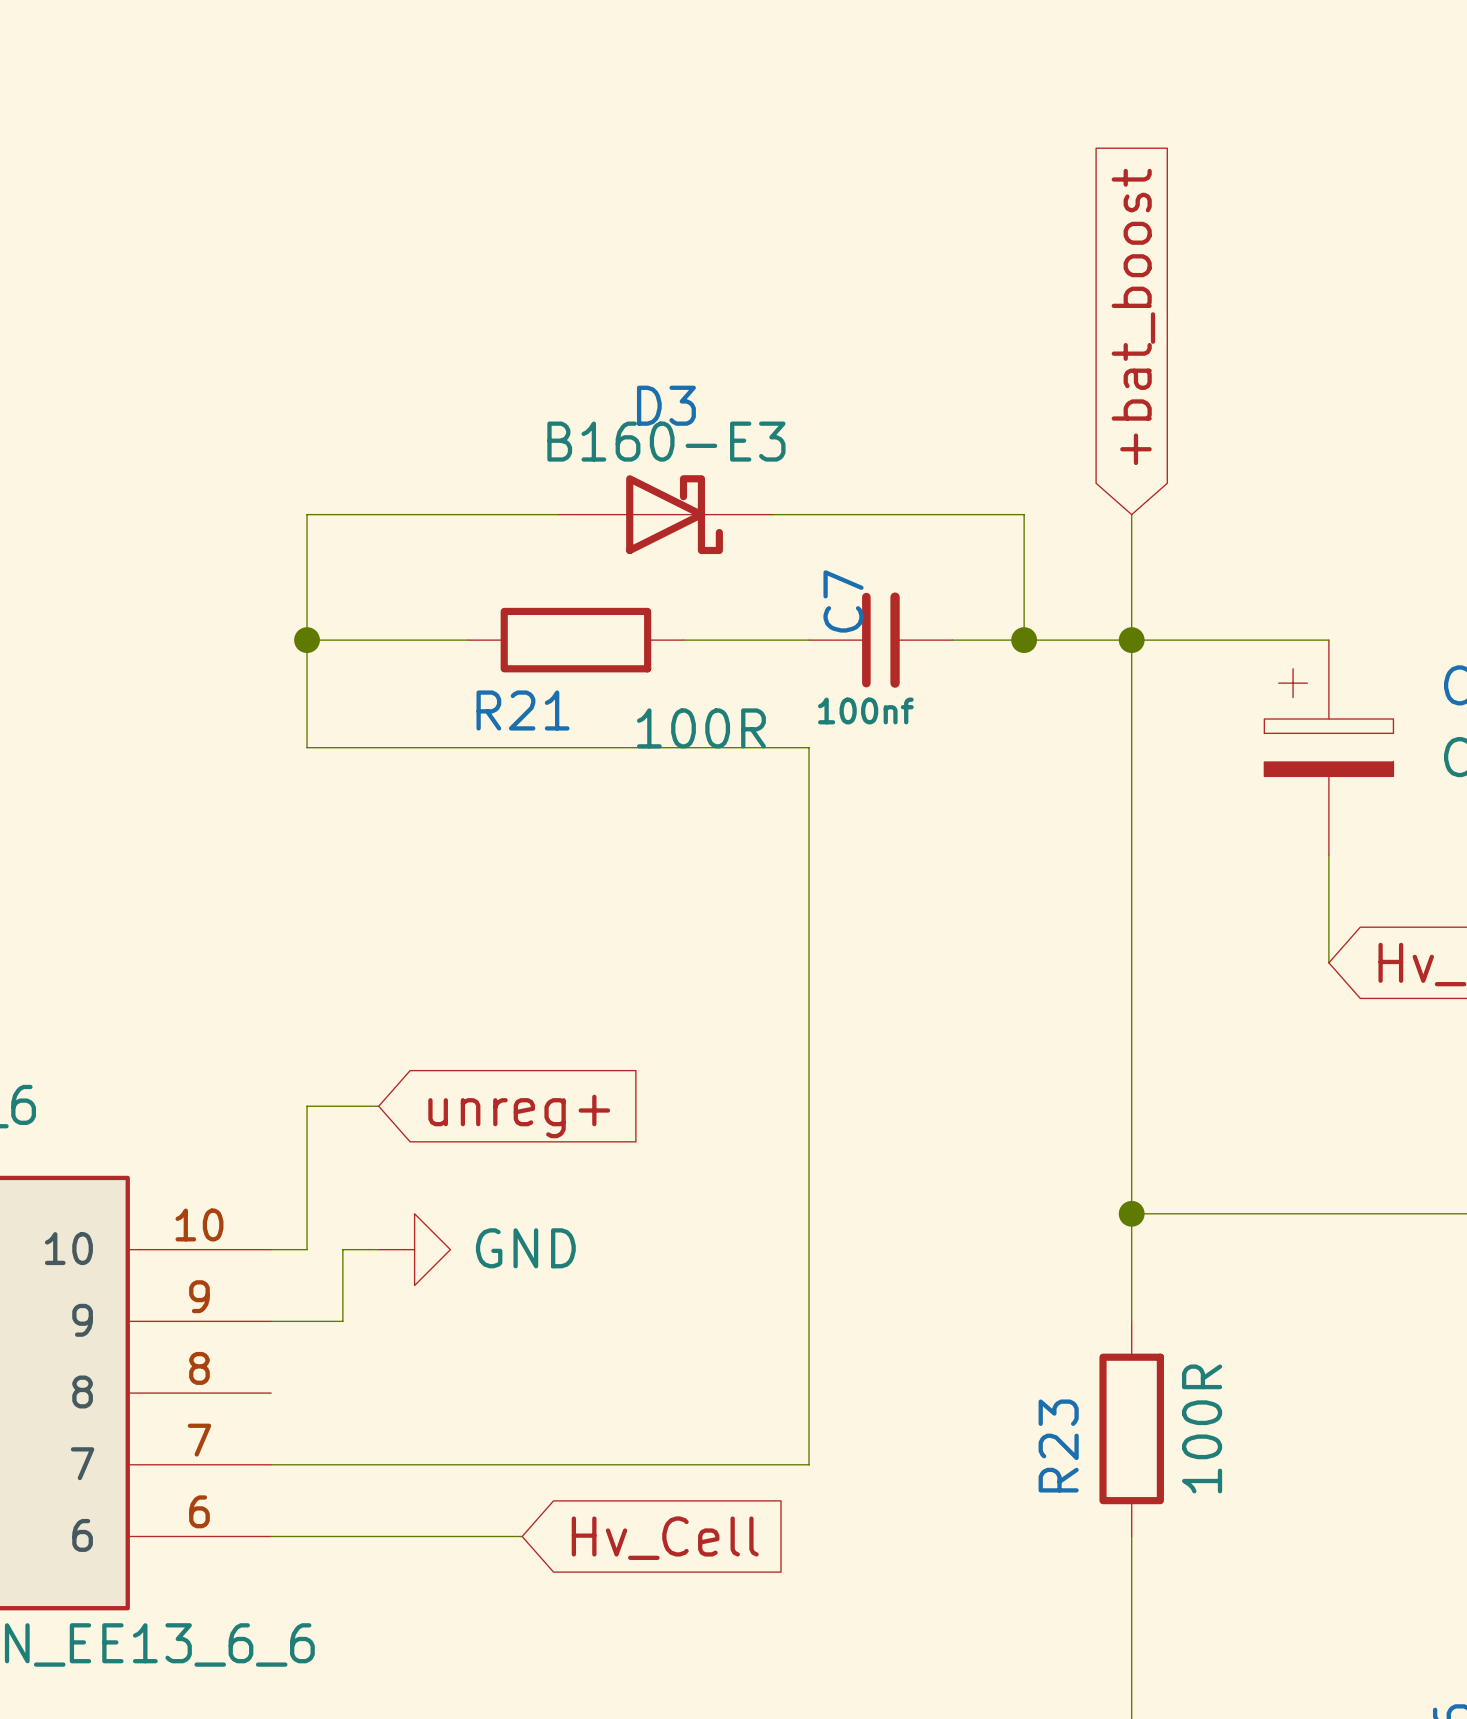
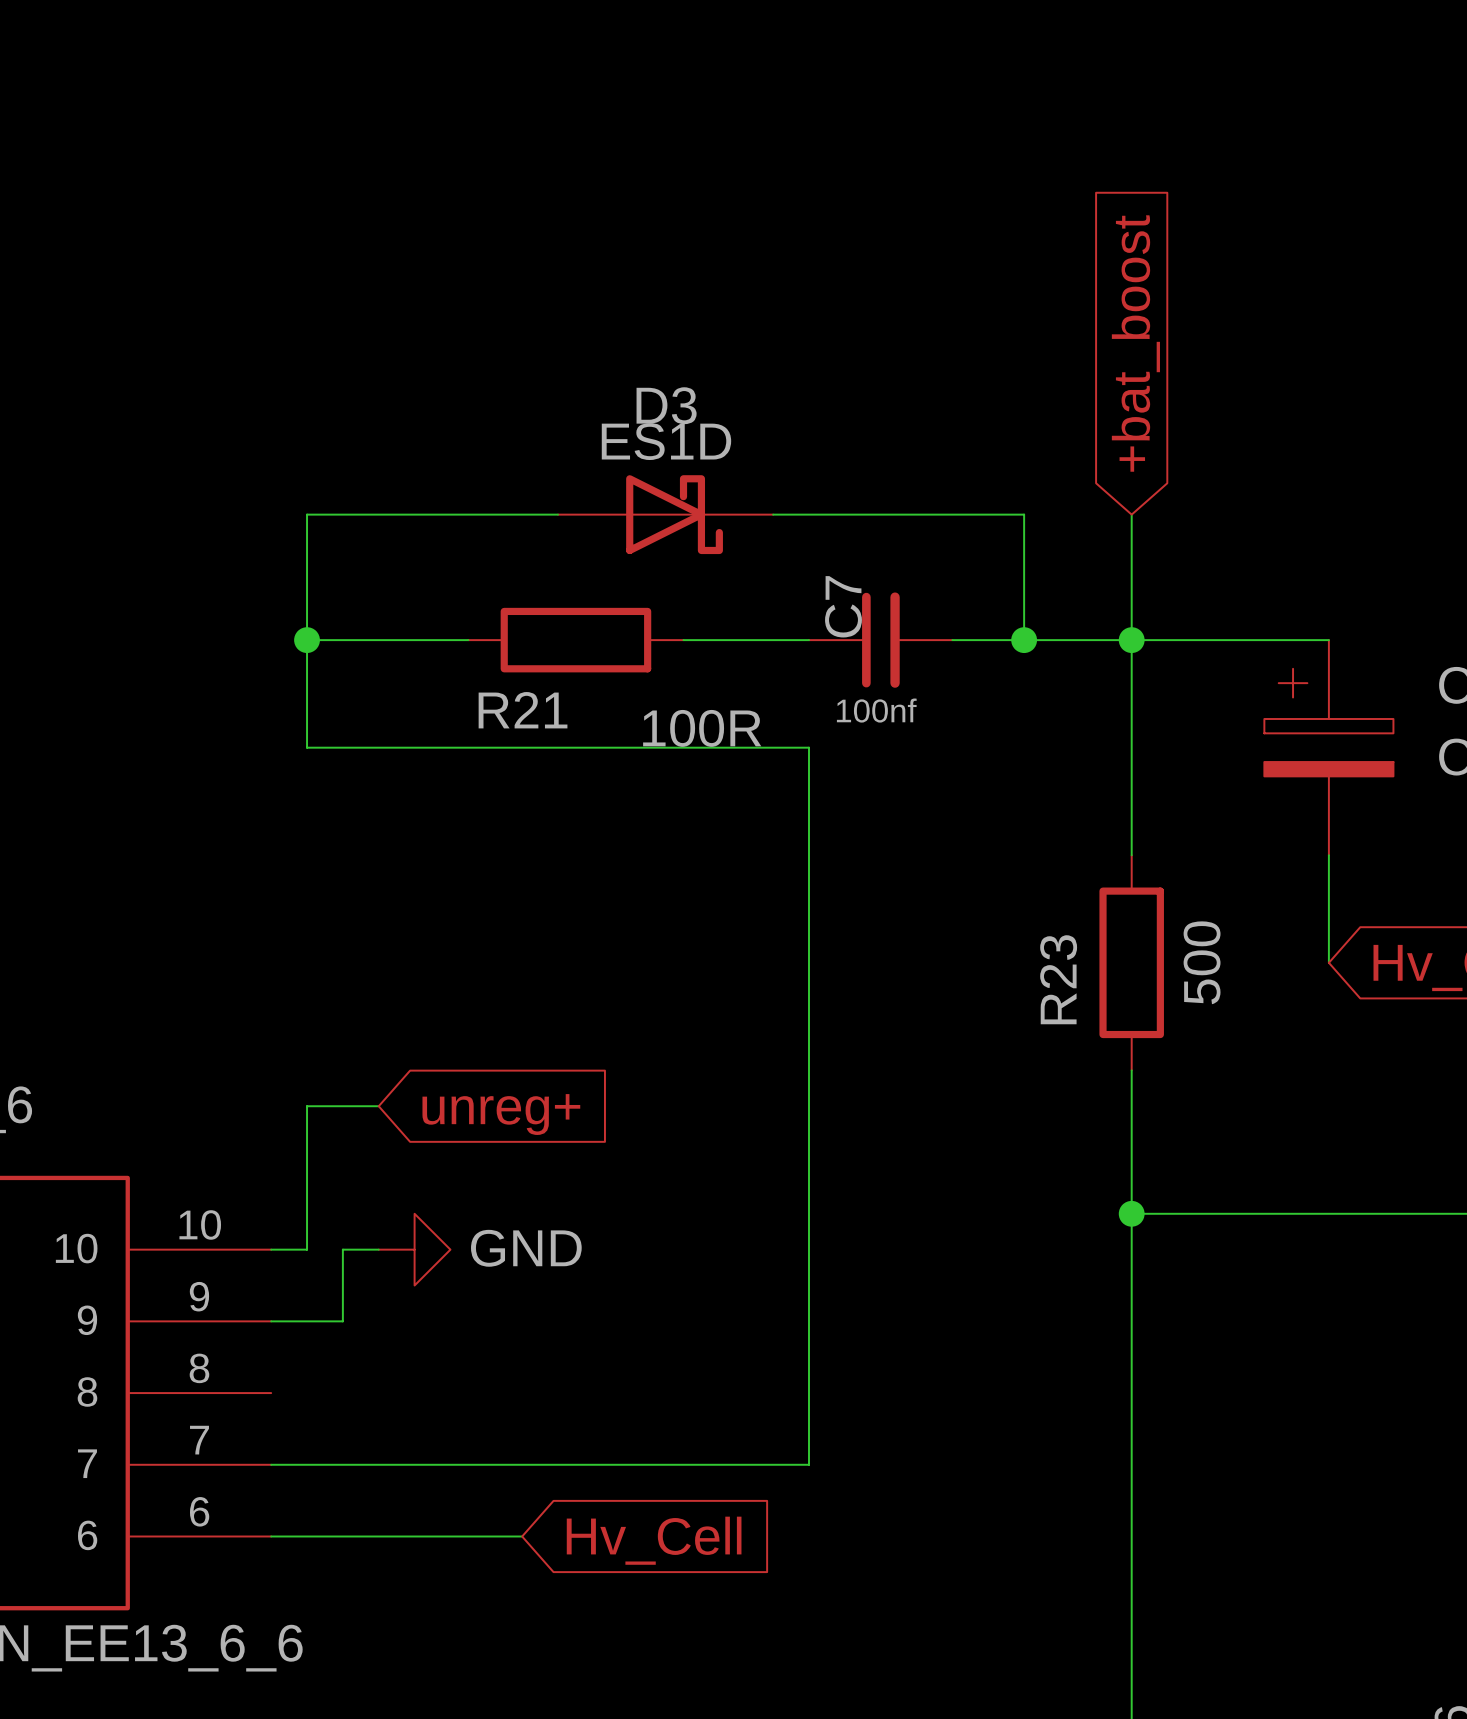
D3 value: B160-E3 (666, 441) -> ES1D (666, 441)
wire: (1131, 855) (1131, 1070) -> (1131, 1321) (1131, 1536)
R23 position: (1131, 1428) -> (1131, 962)
R23 value: 100R (1202, 1428) -> 500 (1202, 962)

